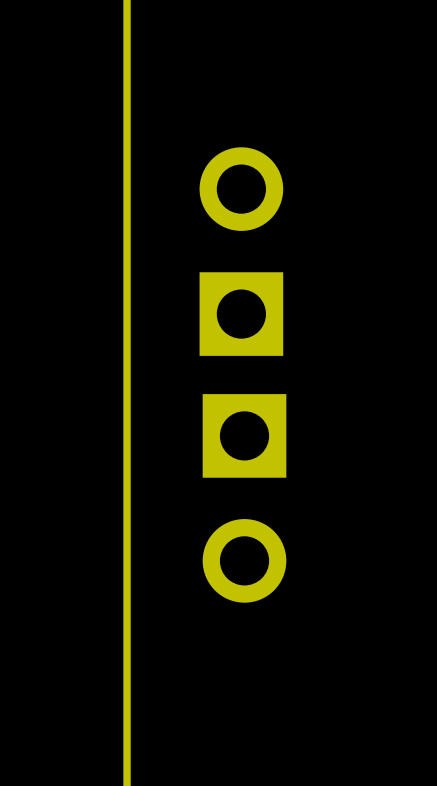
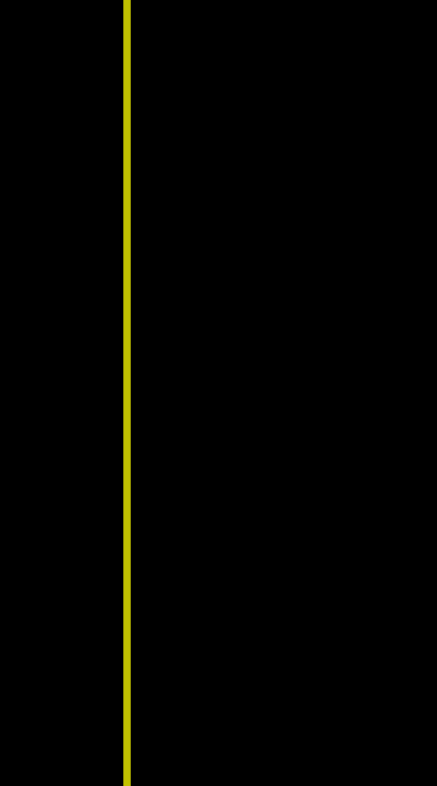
part: (241, 251) -> none
part: (244, 498) -> none

